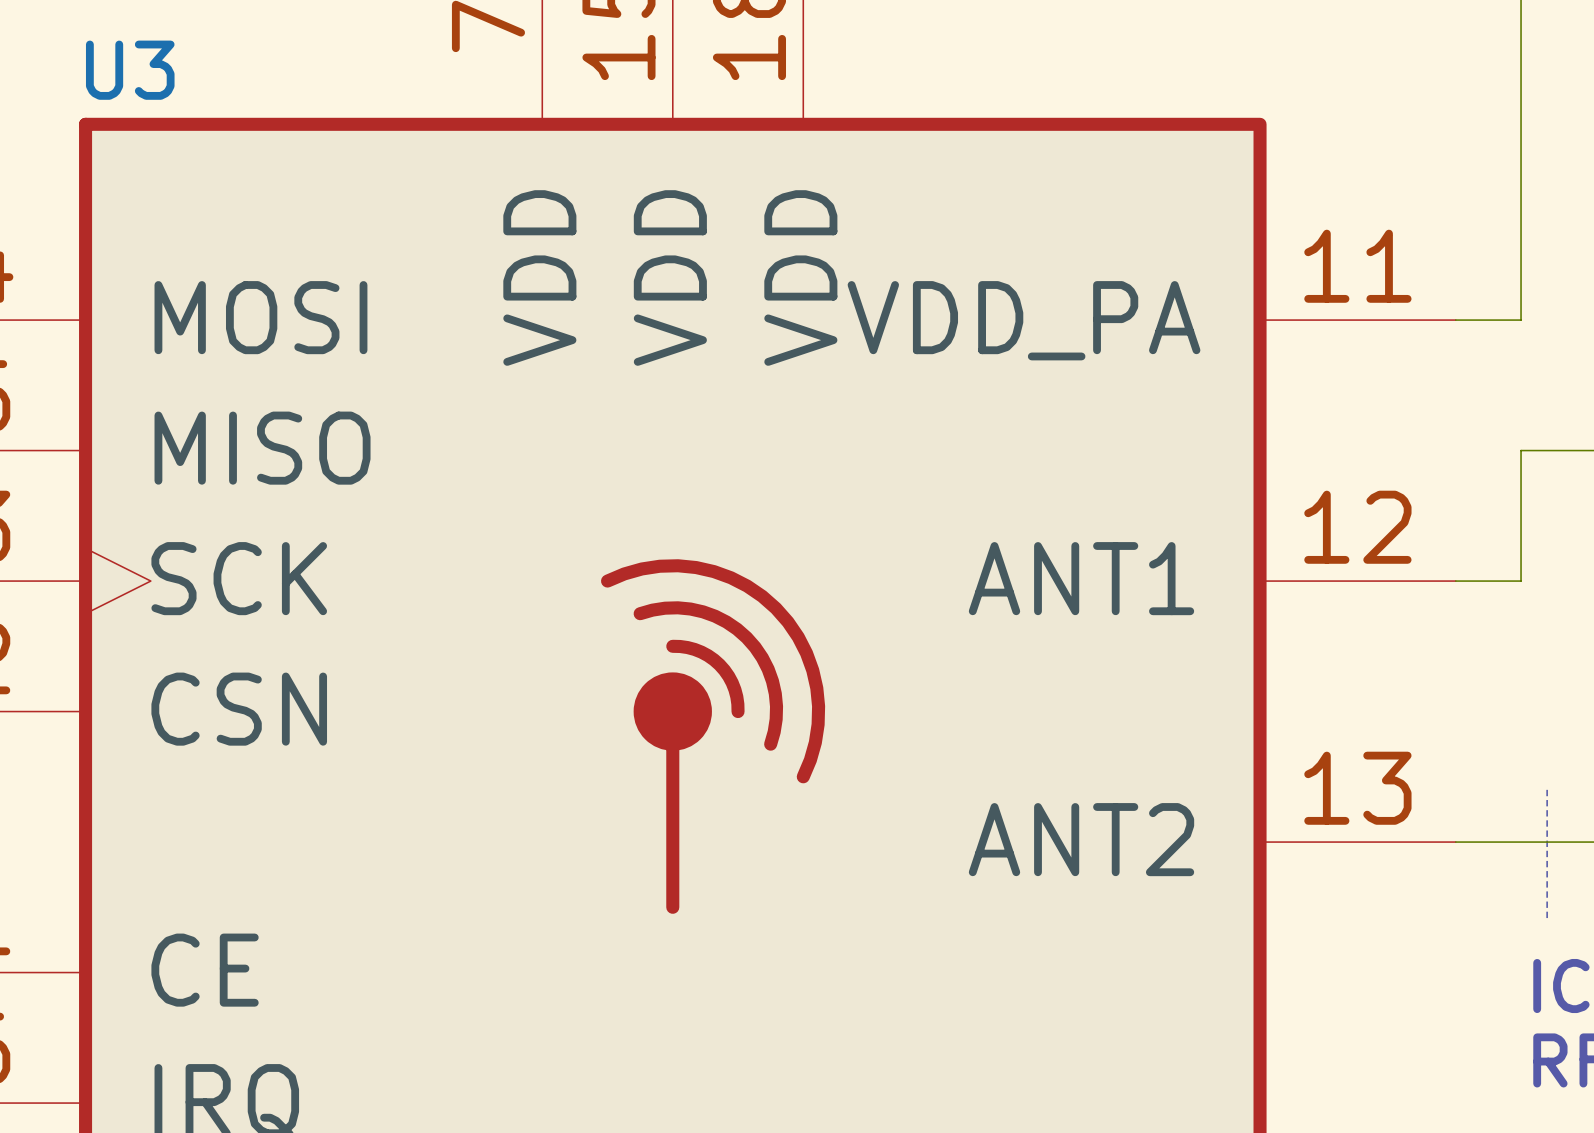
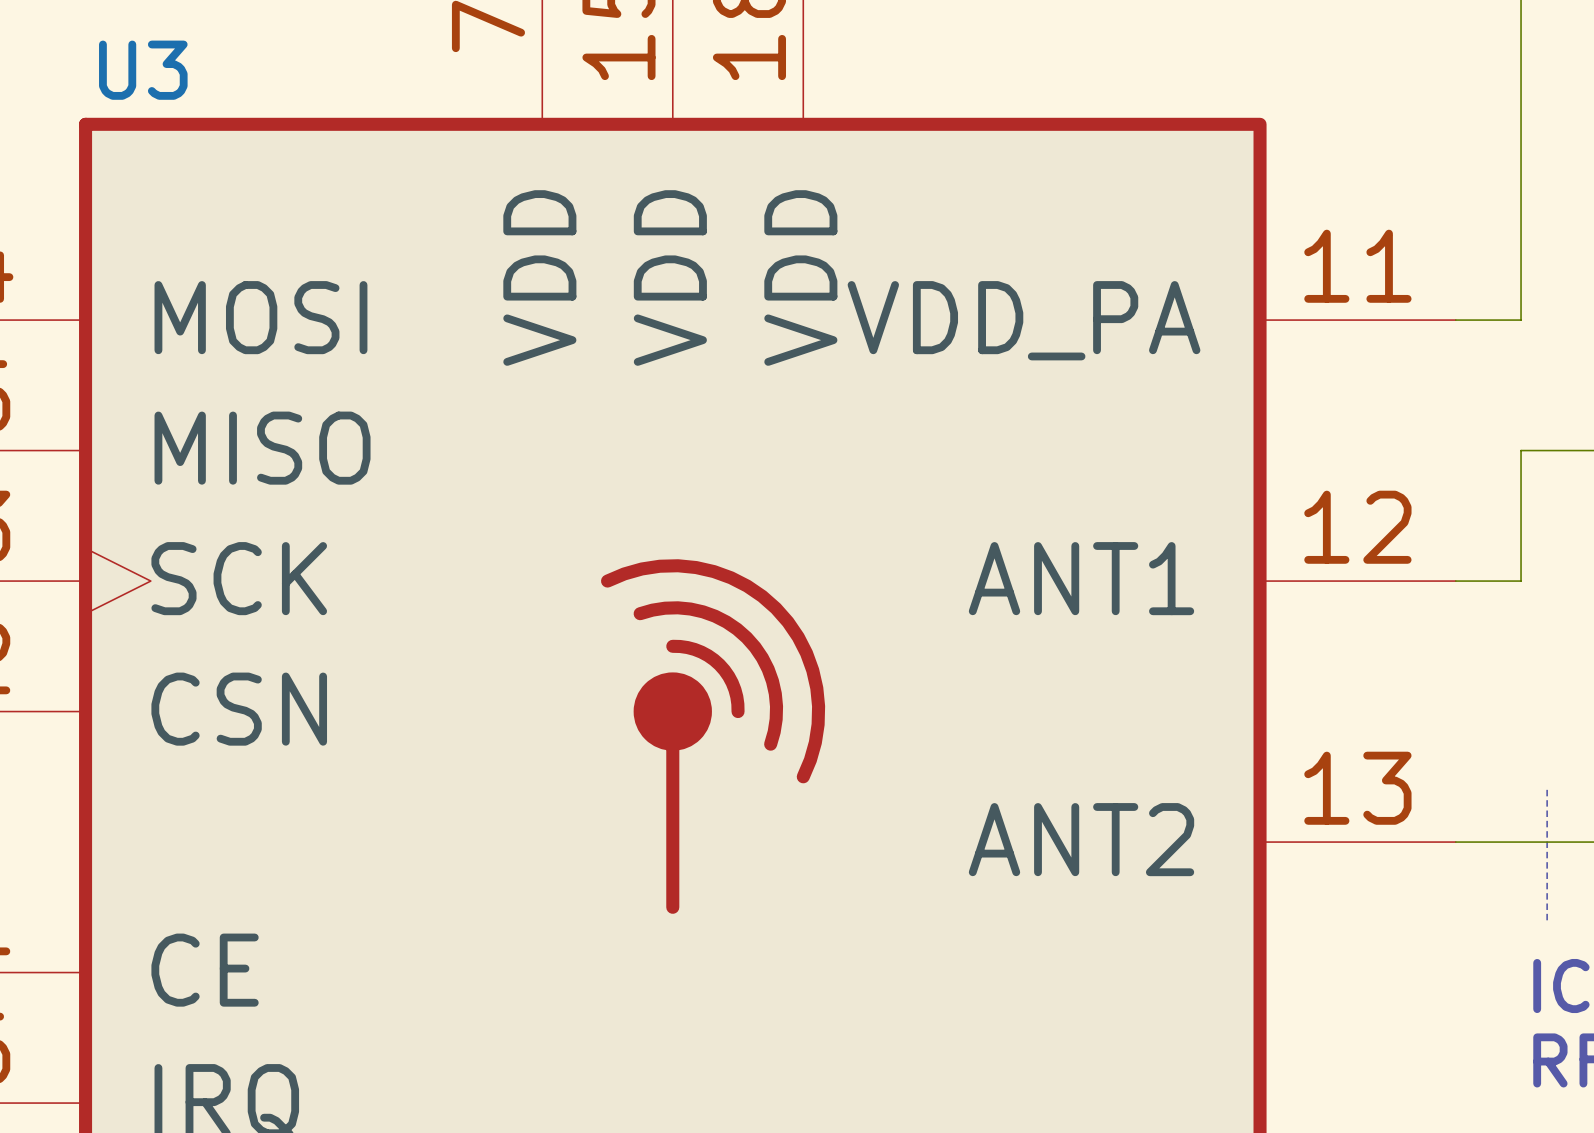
U3 name position: U3 (130, 70) -> U3 (143, 70)

